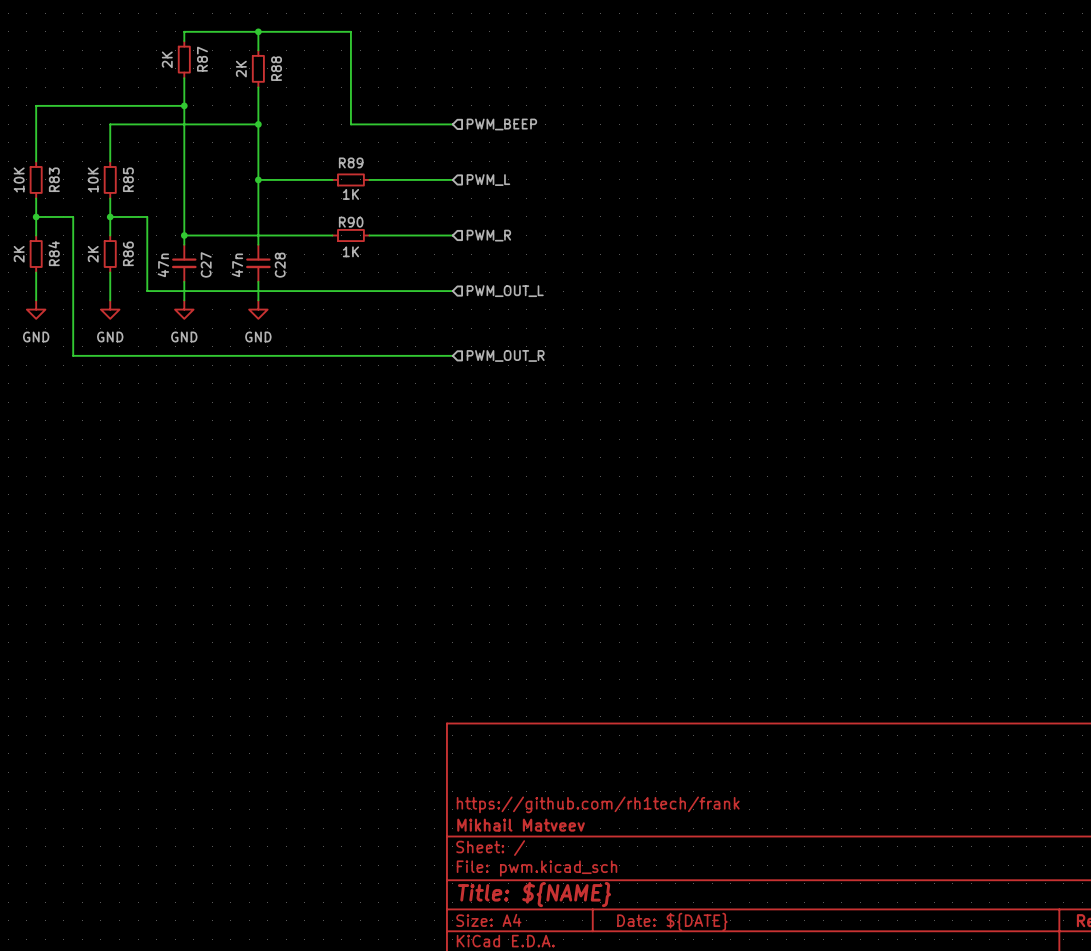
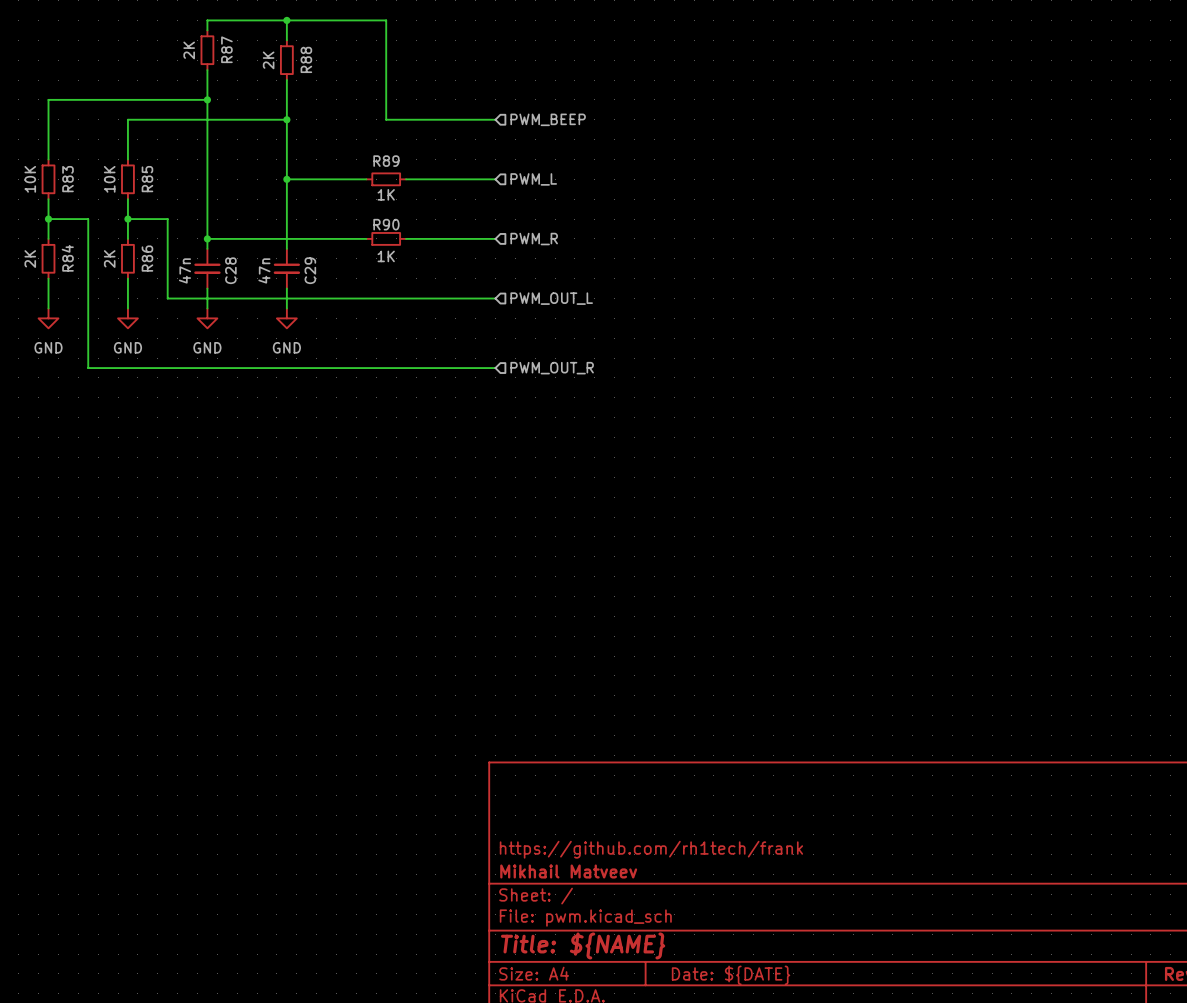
C27 name: C27 (206, 264) -> C28 (230, 270)
C28 name: C28 (280, 265) -> C29 (310, 270)

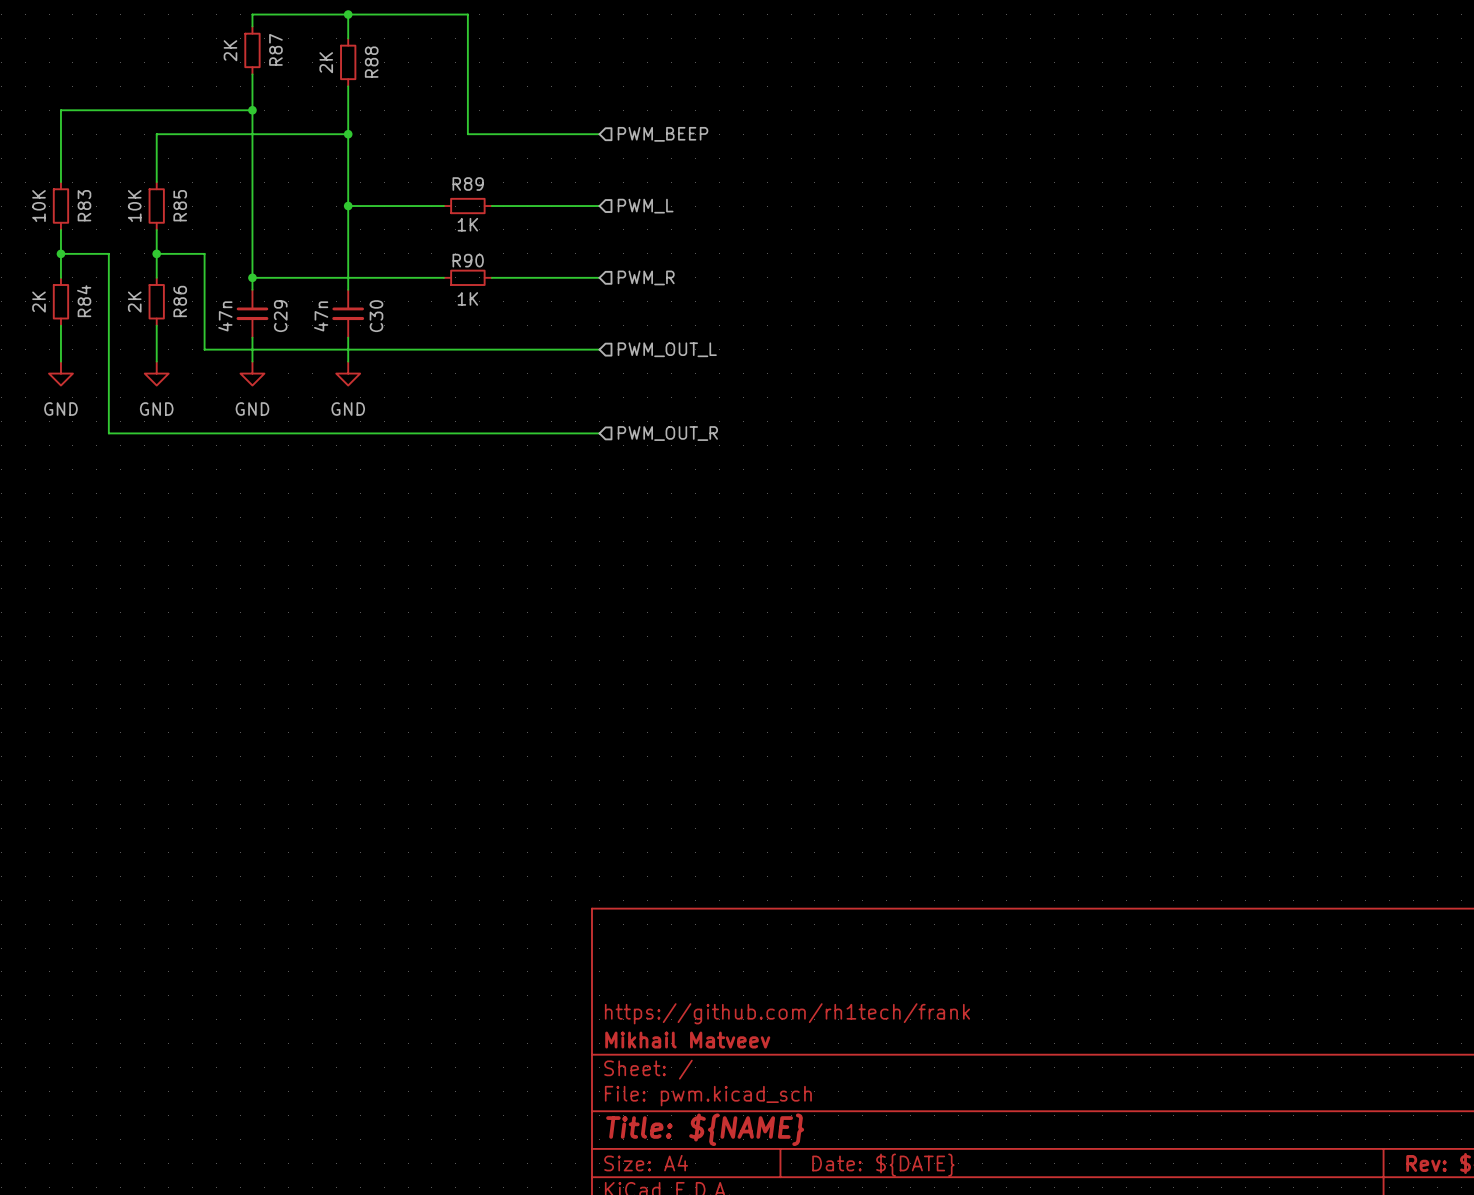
C28 name: C28 (230, 270) -> C29 (280, 316)
C29 name: C29 (310, 270) -> C30 (376, 316)

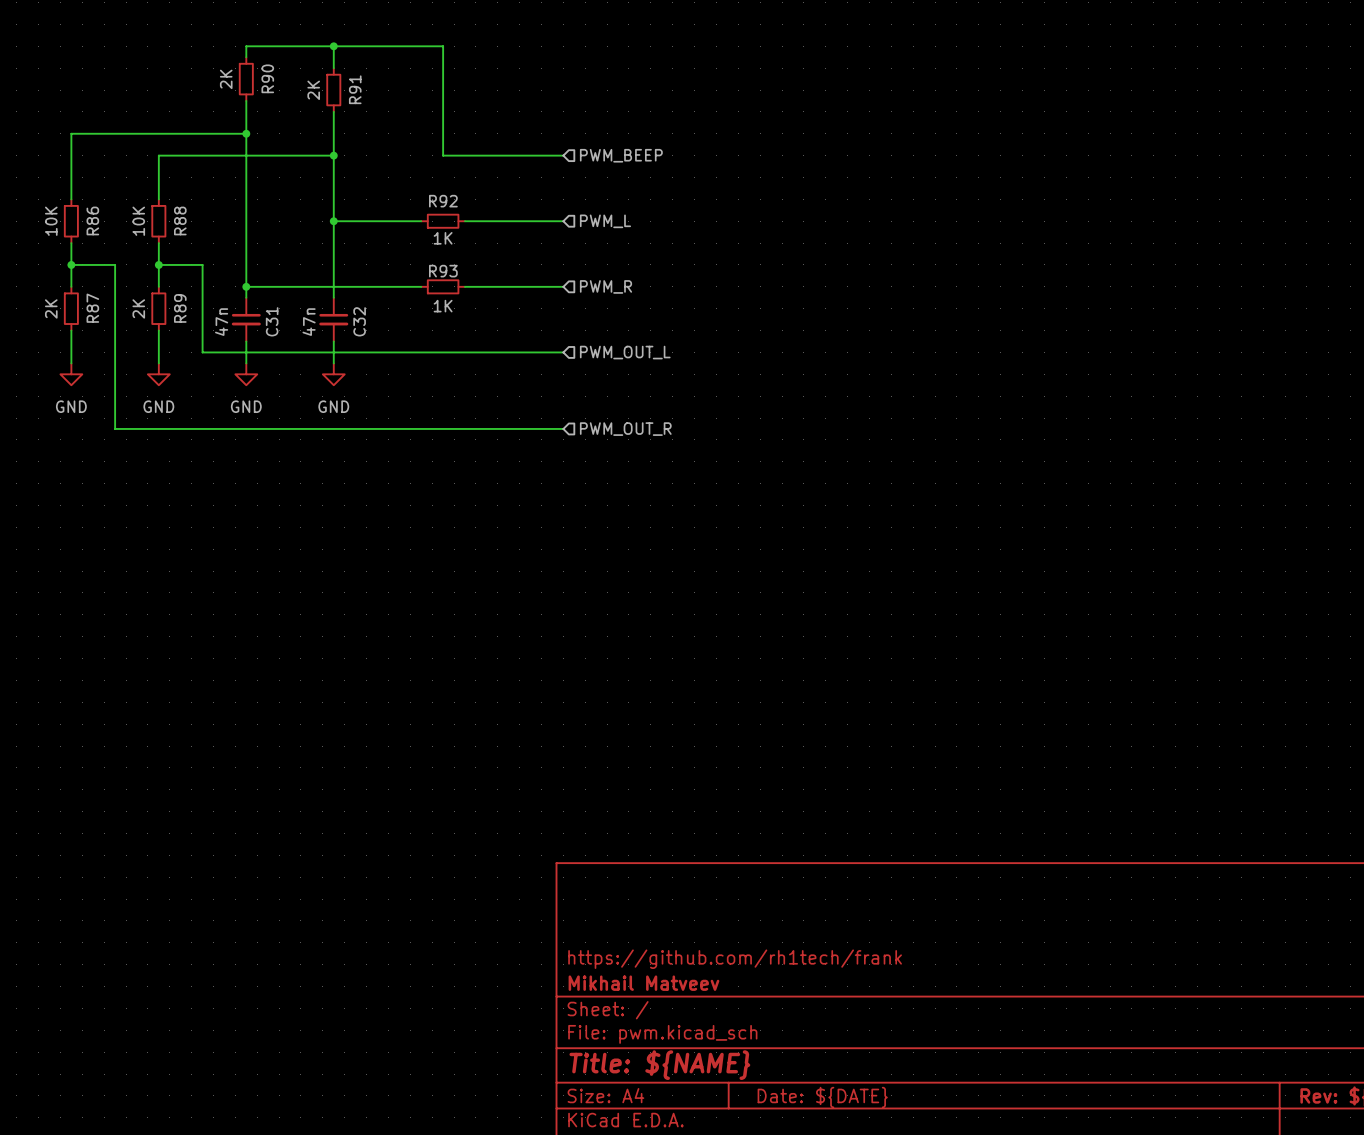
R87 name: R87 (275, 49) -> R90 (267, 78)
R88 name: R88 (371, 62) -> R91 (355, 89)
R89 name: R89 (468, 184) -> R92 (443, 201)
R83 name: R83 (84, 205) -> R86 (92, 220)
R85 name: R85 (180, 205) -> R88 (180, 220)
R90 name: R90 (468, 260) -> R93 (443, 271)
R84 name: R84 (84, 301) -> R87 (92, 308)
R86 name: R86 (180, 301) -> R89 (180, 308)
C29 name: C29 (280, 316) -> C31 (272, 321)
C30 name: C30 (376, 316) -> C32 (359, 321)

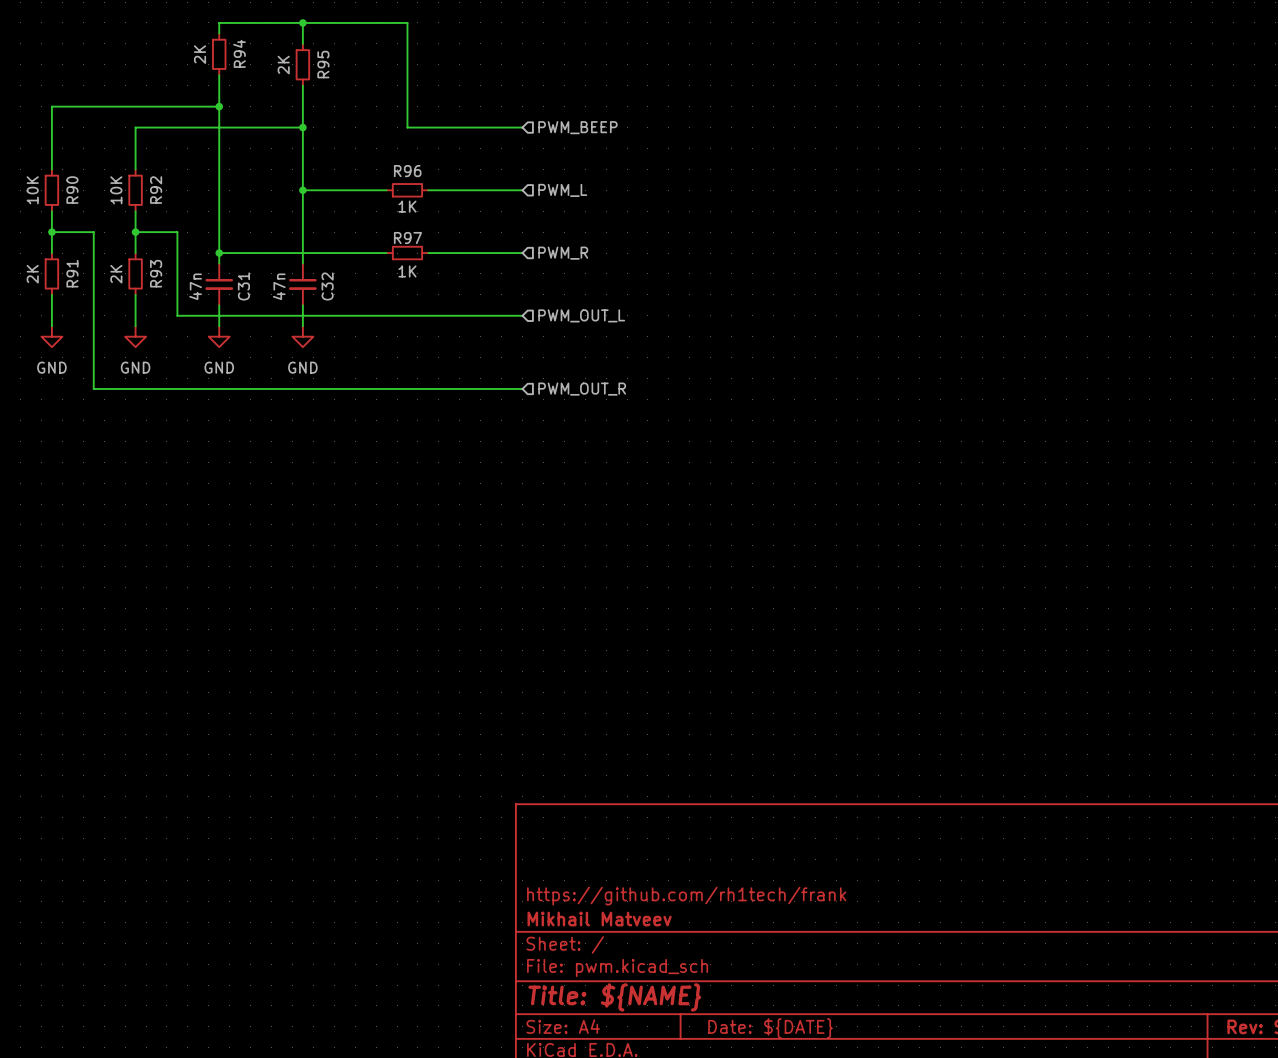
R90 name: R90 (267, 78) -> R94 (239, 53)
R91 name: R91 (355, 89) -> R95 (323, 64)
R92 name: R92 (443, 201) -> R96 (407, 171)
R86 name: R86 (92, 220) -> R90 (72, 190)
R88 name: R88 (180, 220) -> R92 (156, 190)
R93 name: R93 (443, 271) -> R97 (407, 238)
R87 name: R87 (92, 308) -> R91 (72, 273)
R89 name: R89 (180, 308) -> R93 (156, 273)

